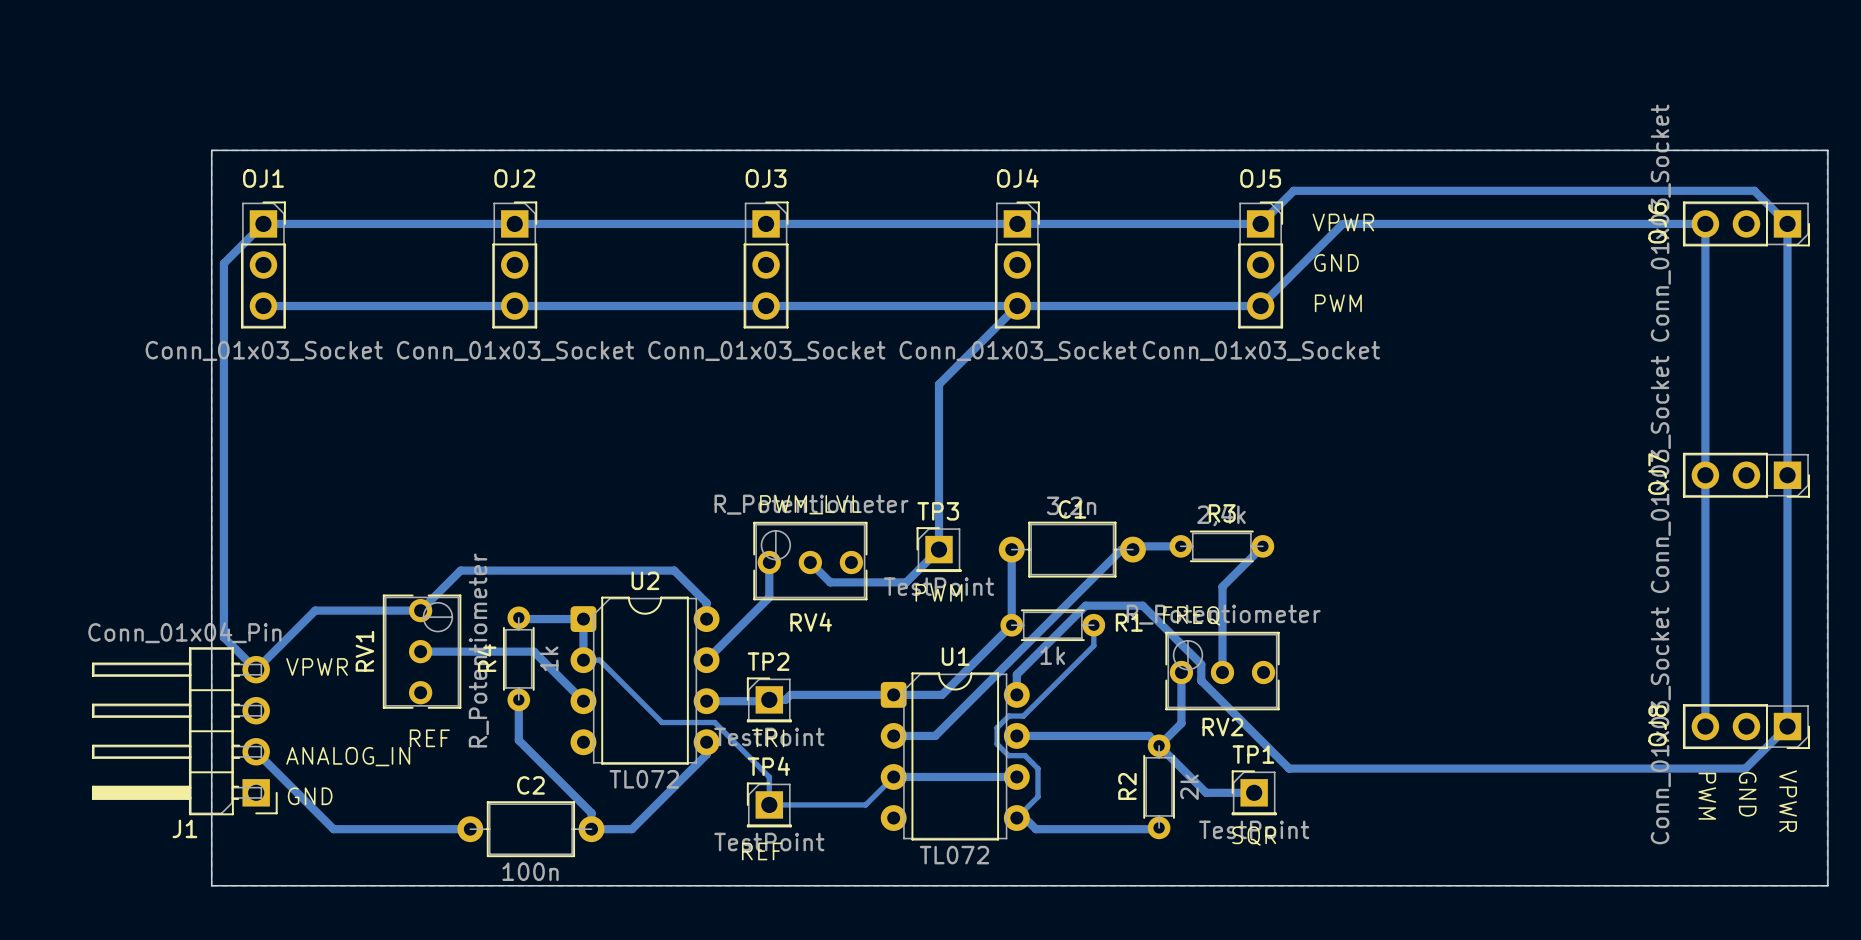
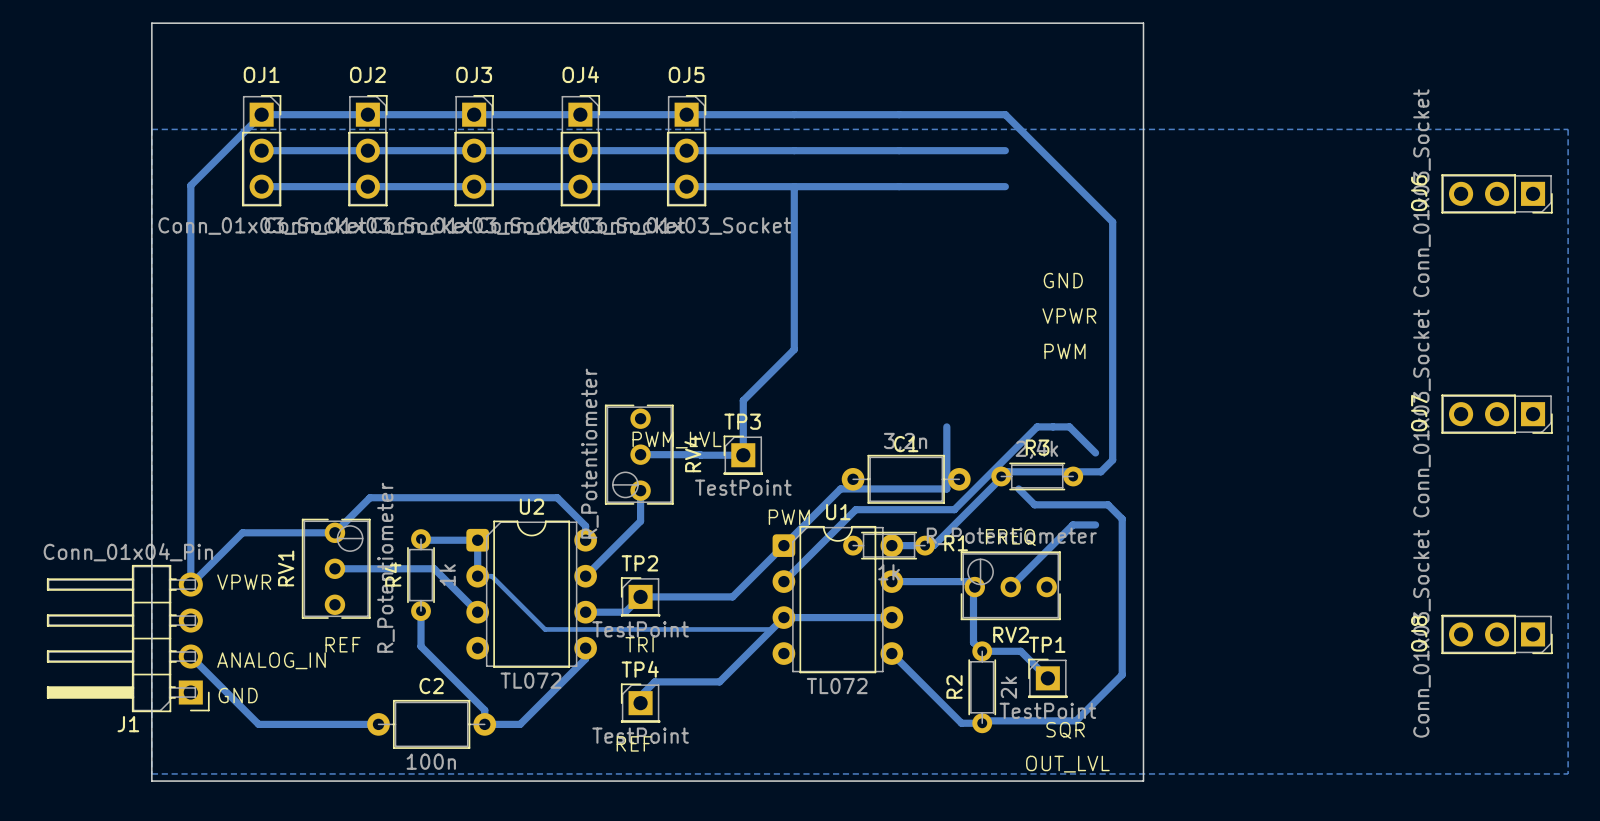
board edge: (211, 150) (1827, 150) (1827, 885) (211, 885) -> (151, 129) (151, 23) (1143, 23) (1143, 781) (151, 781) (151, 773)
bottom track: none -> (261, 150) (1005, 150)
bottom track: none -> (261, 186) (1005, 186)
bottom track: none -> (794, 186) (794, 349) (743, 400) (743, 455) (640, 454)
text position: VPWR (1343, 222) -> VPWR (1069, 316)
text position: GND (1336, 262) -> GND (1063, 280)
OJ1 position: (263, 264) -> (261, 150)
OJ2 position: (514, 264) -> (367, 150)
OJ3 position: (766, 264) -> (474, 150)
OJ4 position: (1017, 264) -> (580, 150)
OJ5 position: (1260, 264) -> (686, 150)
text position: PWM (1338, 303) -> PWM (1064, 351)
bottom track: (263, 306) (1260, 306) (1342, 223) (1705, 223) (1705, 726) -> none
bottom track: (1017, 306) (939, 384) (939, 549) (906, 582) (830, 582) (810, 562) -> none
bottom track: none -> (1095, 452) (1069, 426) (1037, 426) (954, 509) (855, 509) (783, 581)
bottom track: (1180, 546) (1136, 546) (1132, 549) (1121, 549) (935, 735) (893, 735) -> none
bottom track: (1262, 546) (1222, 586) (1222, 672) -> none
TP3 position: (939, 549) -> (743, 455)
bottom track: (1011, 549) (1011, 625) (942, 694) (790, 694) (785, 699) (751, 701) -> (946, 426) (946, 488) (840, 488) (732, 596) (640, 596) (625, 612)
bottom track: none -> (1018, 488) (1034, 504) (1108, 504) (1122, 518) (1122, 674) (1076, 720) (984, 720) (982, 723) (961, 723) (891, 653)
RV4 rotation: 0° (810, 561) -> 90° counterclockwise (639, 454)
bottom track: none -> (1095, 524) (1072, 524) (1010, 587)
bottom track: (1093, 625) (1093, 645) (1023, 716) (1008, 716) (997, 727) (997, 744) (1008, 755) (1025, 755) (1037, 768) (1037, 796) (1016, 818) (1024, 818) (1035, 829) (1159, 827) -> none
bottom track: (256, 669) (223, 637) (223, 263) (263, 223) (1260, 223) (1293, 190) (1754, 190) (1787, 223) (1787, 726) (1745, 768) (1289, 768) (1201, 680) (1201, 664) (1142, 605) (1085, 605) (1016, 674) (1016, 694) -> (190, 584) (190, 185) (261, 114) (1005, 114) (1112, 222) (1112, 460) (1100, 471) (1007, 471) (933, 545) (891, 545)
RV2 position: (1222, 671) -> (1010, 585)
bottom track: (1181, 672) (1181, 723) (1159, 745) (1206, 792) (1254, 792) -> none
TP2 position: (769, 699) -> (640, 596)
bottom track: none -> (783, 617) (891, 617)
bottom track: none -> (783, 617) (719, 681) (654, 681) (640, 696)
bottom track: (660, 720) (661, 722) (714, 722) (769, 777) (769, 804) (865, 804) (893, 776) (1016, 776) -> (545, 629) (772, 629) (783, 617)
bottom track: (1016, 735) (1149, 735) -> (891, 581) (969, 581) (974, 587) (973, 642)
bottom track: none -> (982, 651) (1020, 651) (1047, 678)
U1 position: (955, 756) -> (837, 599)
TP1 position: (1254, 792) -> (1047, 678)
text: GND (1747, 794) -> none
text: PWM (1707, 796) -> none
text: VPWR (1788, 801) -> none
text: none -> OUT_LVL (1067, 764)

